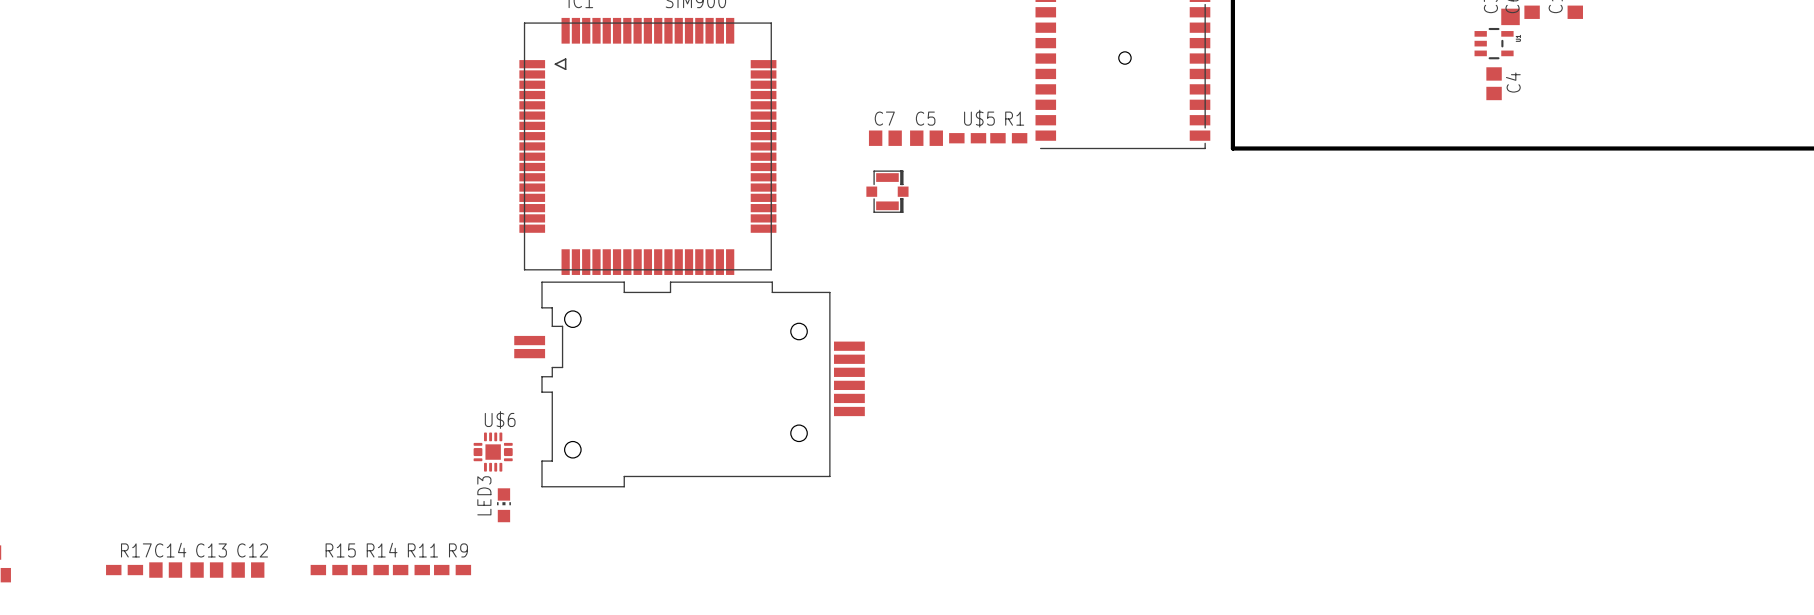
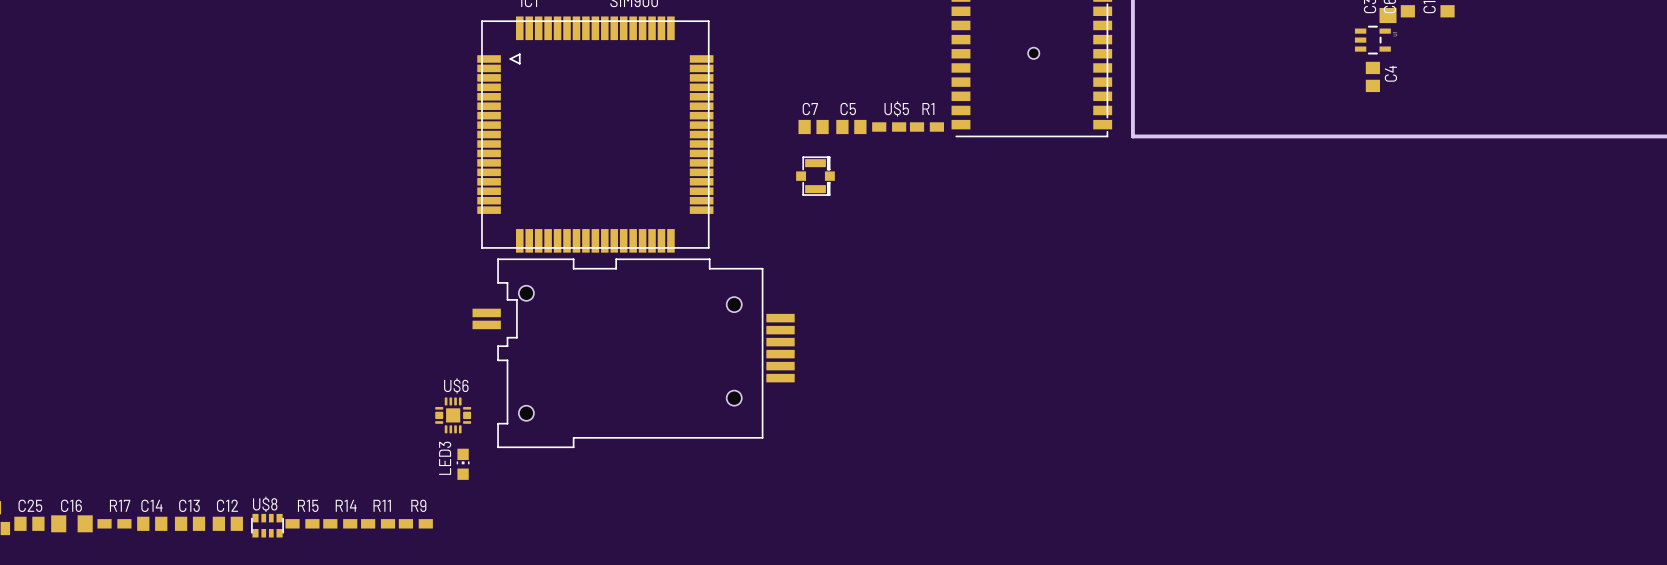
C25: none -> (29, 523)
C16: none -> (71, 523)
U$8: none -> (267, 525)

